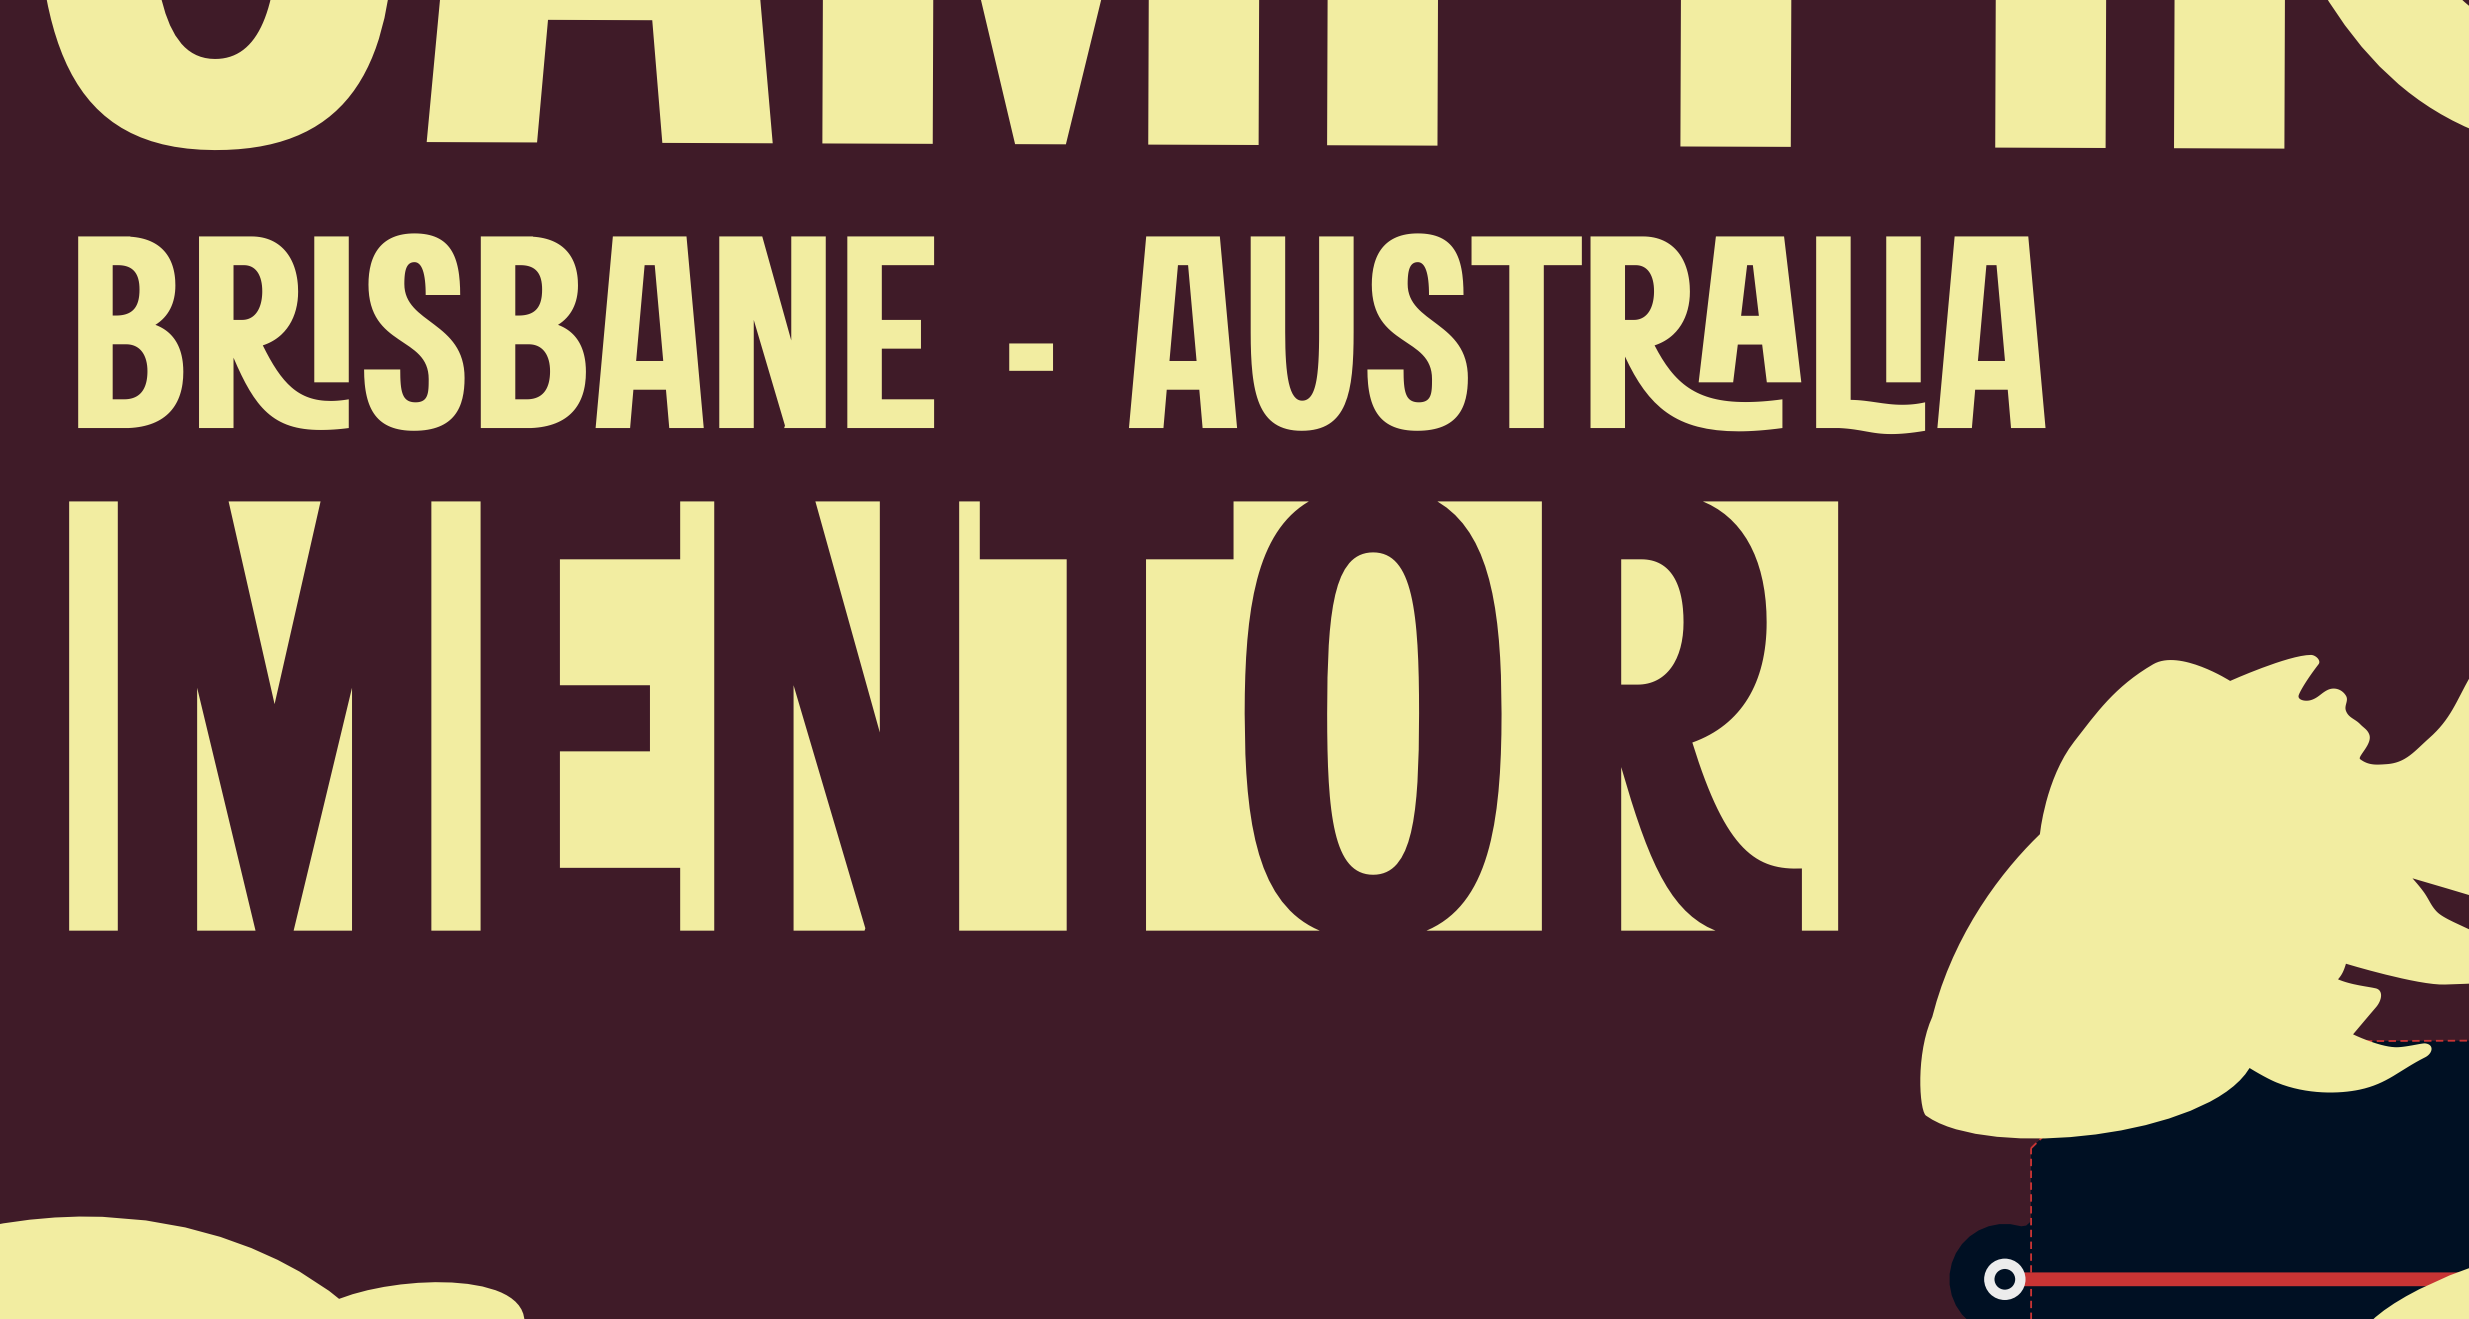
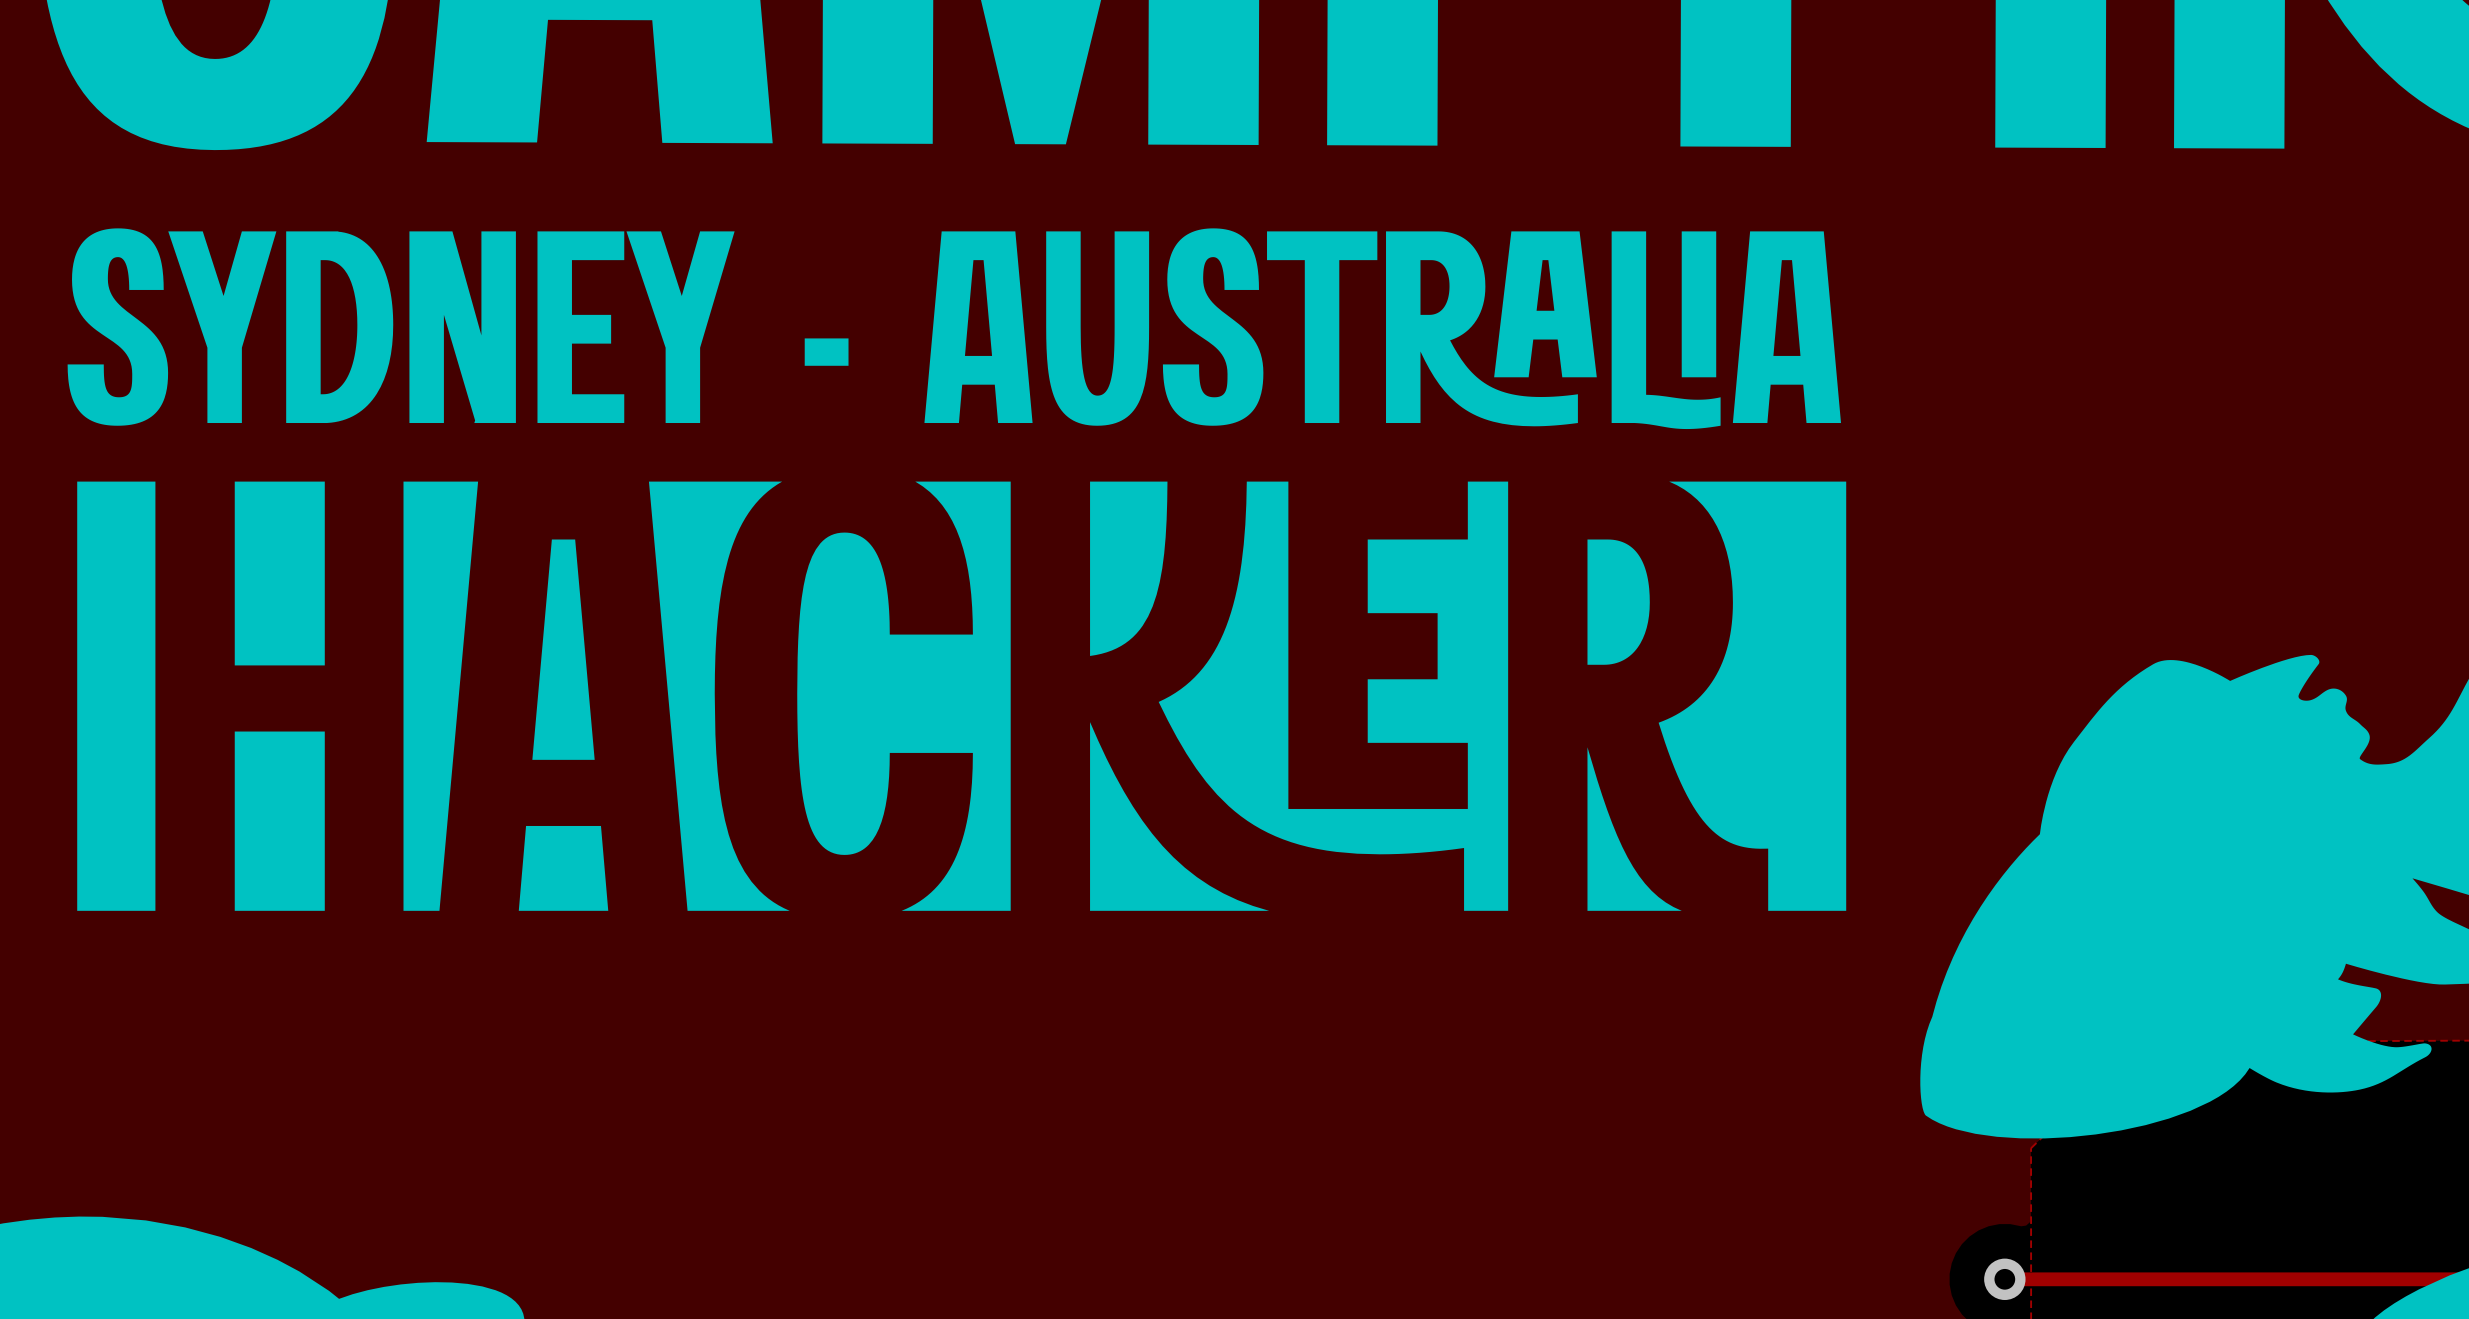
drawing: none -> [168, 231, 277, 424]
drawing: none -> [518, 231, 1270, 911]
drawing: [78, 236, 349, 430] -> none
drawing shape: [314, 236, 349, 383] -> [286, 231, 394, 424]
drawing: [480, 236, 1320, 931] -> none
drawing shape: [595, 236, 704, 429] -> [626, 231, 735, 424]
drawing position: (1749, 309) -> (1545, 304)
drawing position: (1903, 309) -> (1698, 304)
drawing position: (414, 332) -> (117, 327)
drawing position: (772, 332) -> (462, 327)
drawing position: (890, 332) -> (580, 327)
drawing position: (1417, 332) -> (1213, 327)
drawing position: (1526, 332) -> (1322, 327)
drawing position: (1991, 332) -> (1786, 327)
drawing position: (1302, 333) -> (1097, 328)
drawing position: (1686, 333) -> (1481, 328)
drawing position: (1870, 335) -> (1666, 330)
drawing position: (1031, 357) -> (826, 352)
drawing shape: [69, 501, 118, 931] -> [77, 481, 156, 911]
drawing shape: [228, 501, 321, 705] -> [234, 481, 325, 666]
drawing shape: [431, 501, 481, 931] -> [403, 481, 479, 911]
drawing: [1426, 501, 1542, 931] -> none
drawing shape: [1692, 501, 1839, 931] -> [1658, 481, 1847, 911]
drawing shape: [1327, 552, 1420, 875] -> [1158, 481, 1509, 911]
drawing position: (1652, 621) -> (1618, 602)
drawing: [197, 687, 353, 931] -> none
drawing: none -> [234, 731, 325, 911]
drawing position: (1668, 848) -> (1634, 829)

